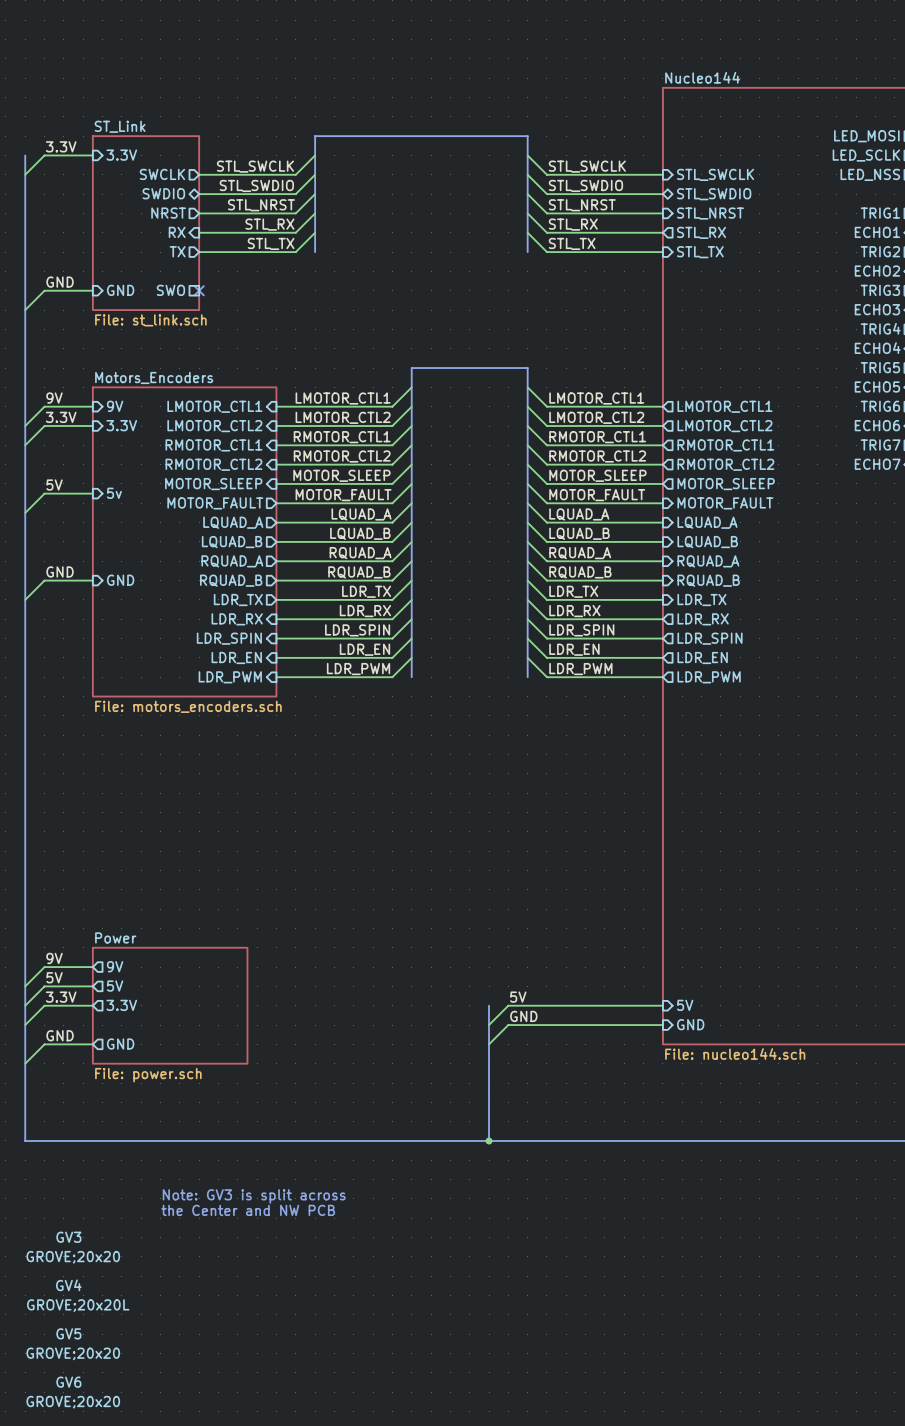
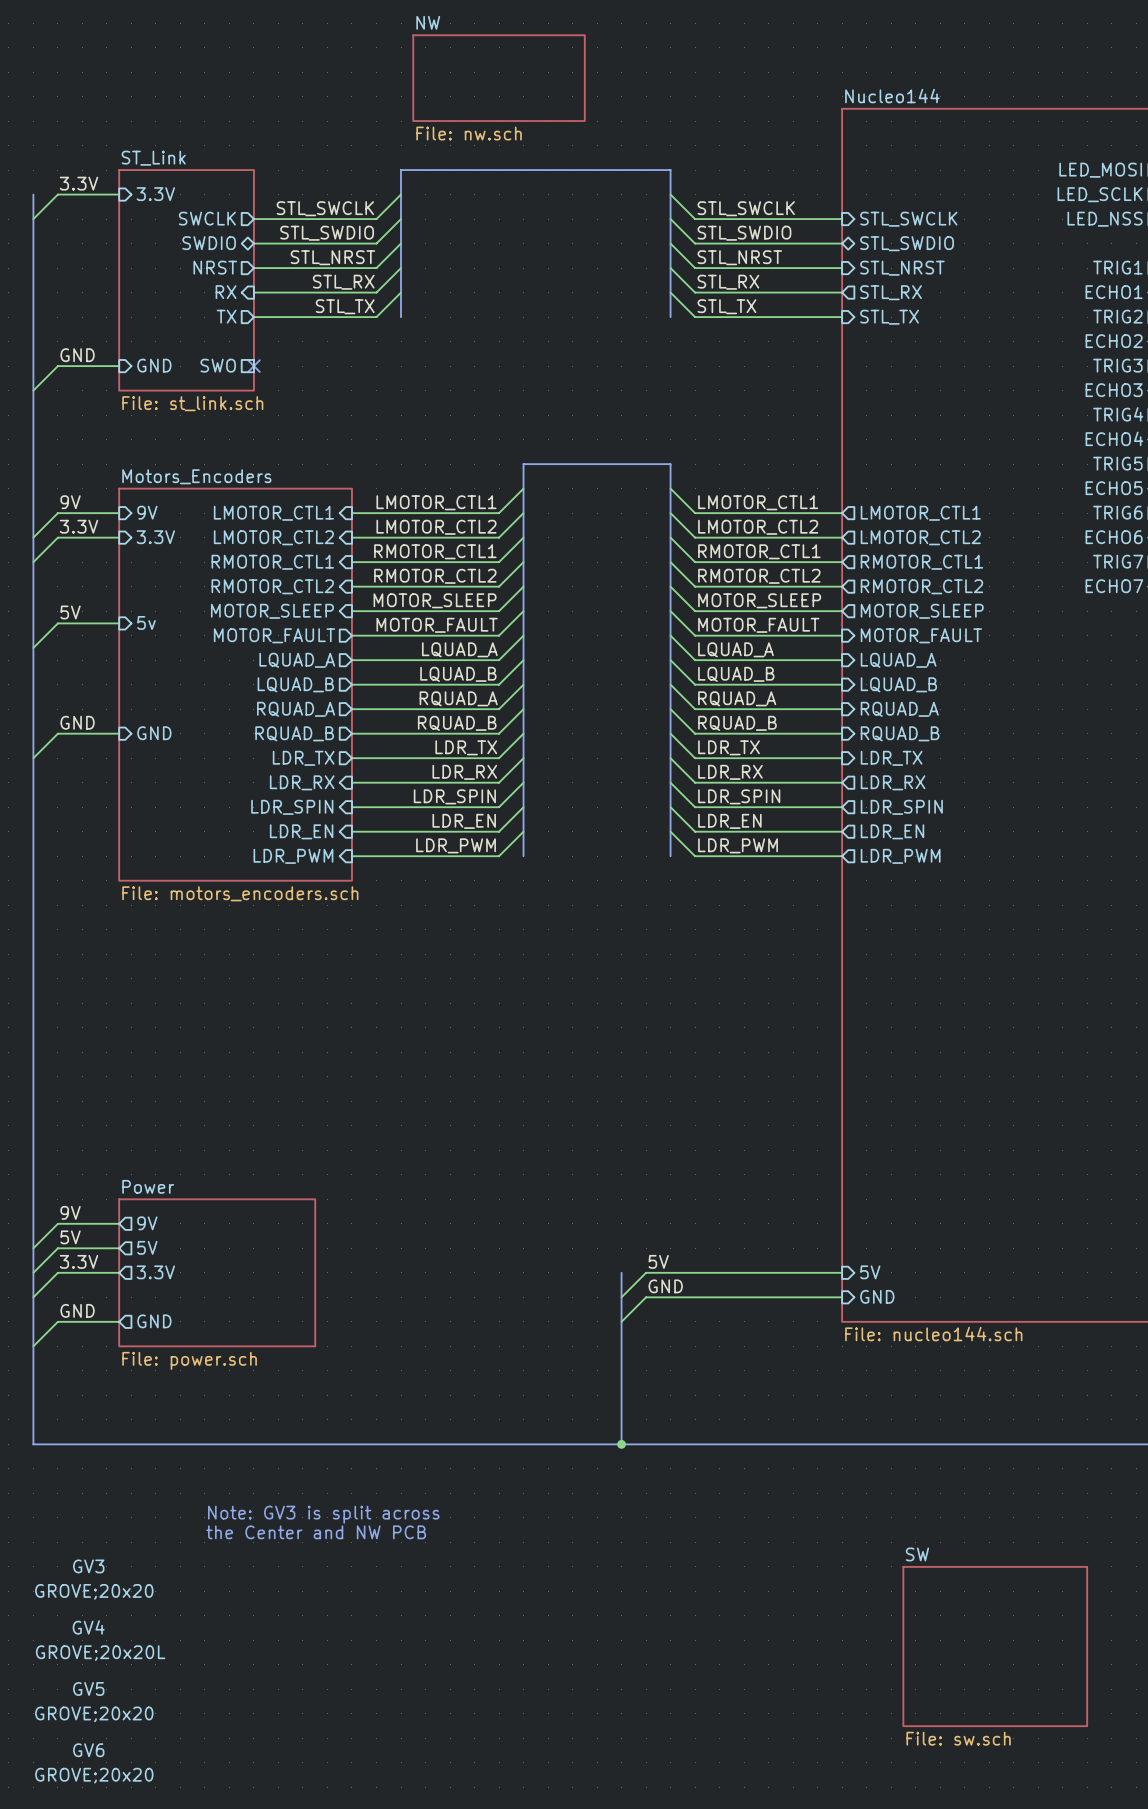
sheet NW: none -> File: nw.sch (499, 78)
sheet SW: none -> File: sw.sch (995, 1646)

